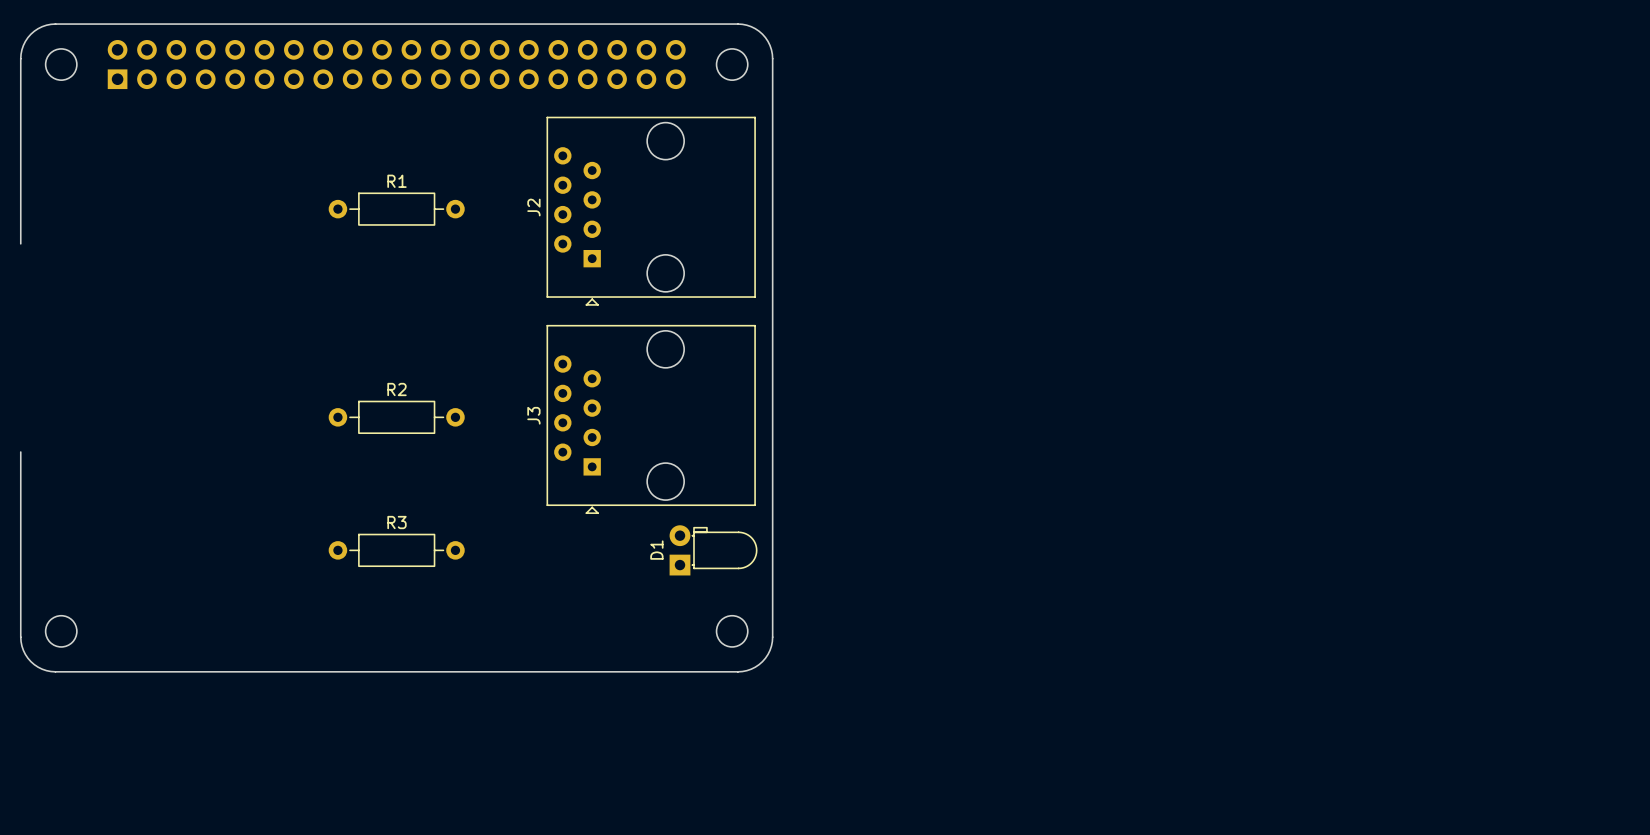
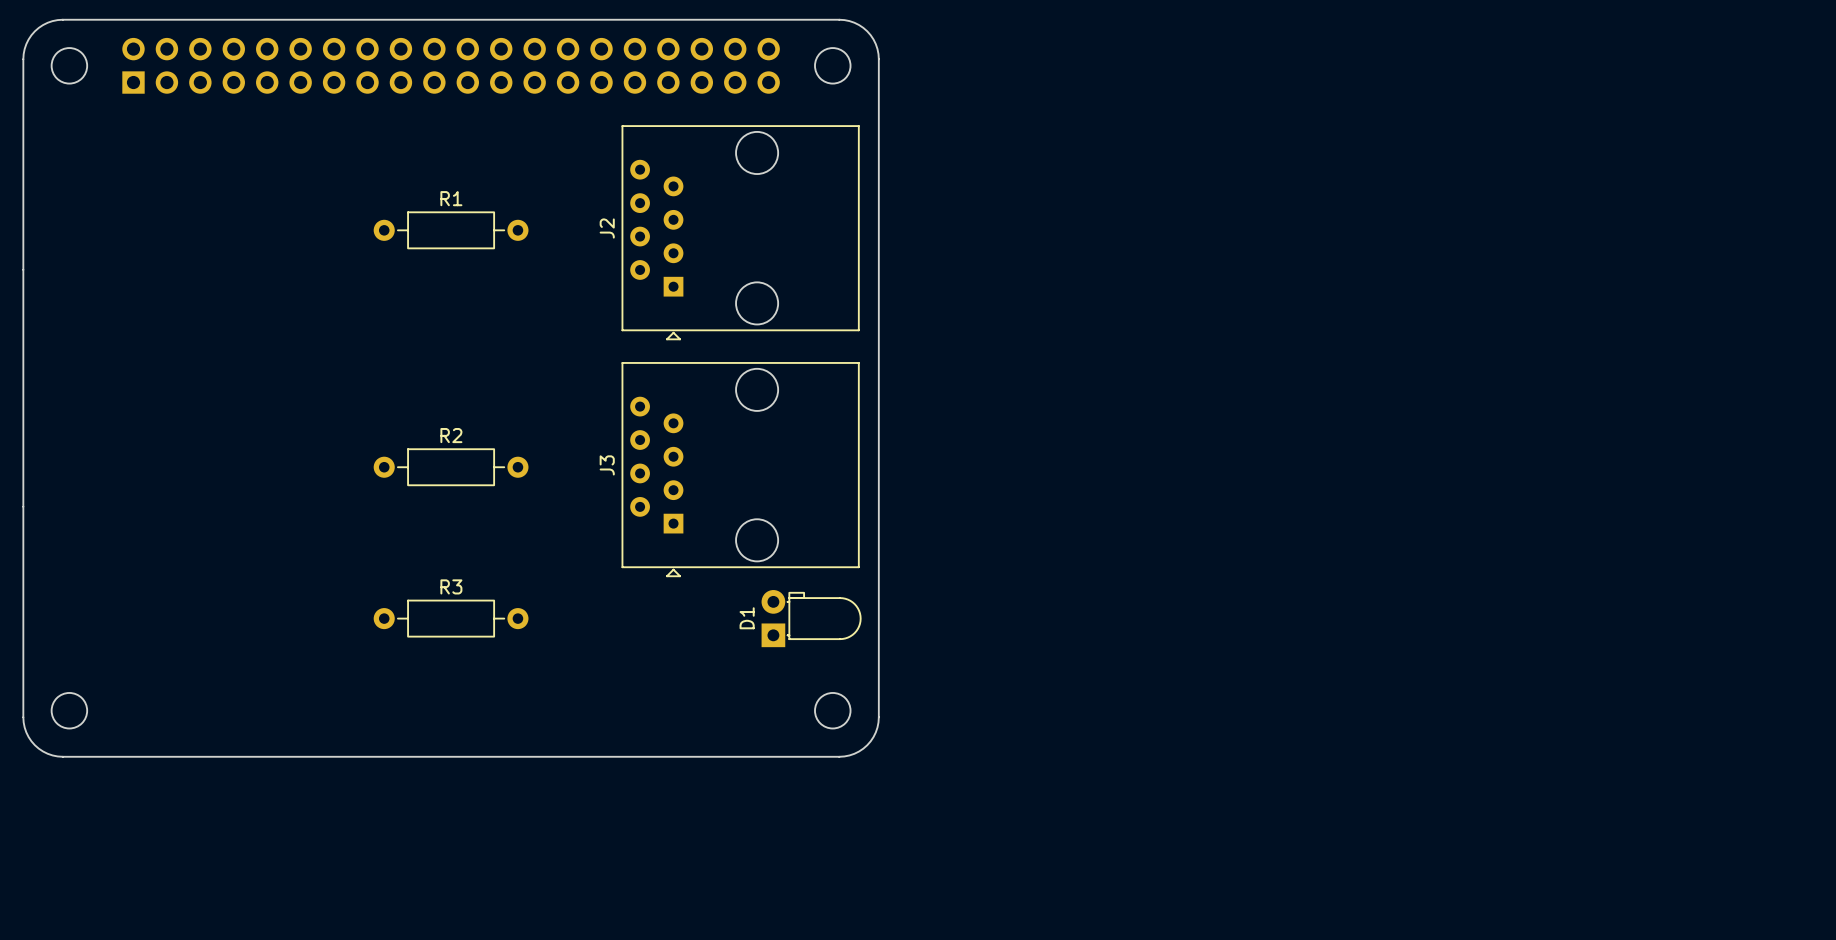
board edge: none -> (23, 269) (23, 506)

